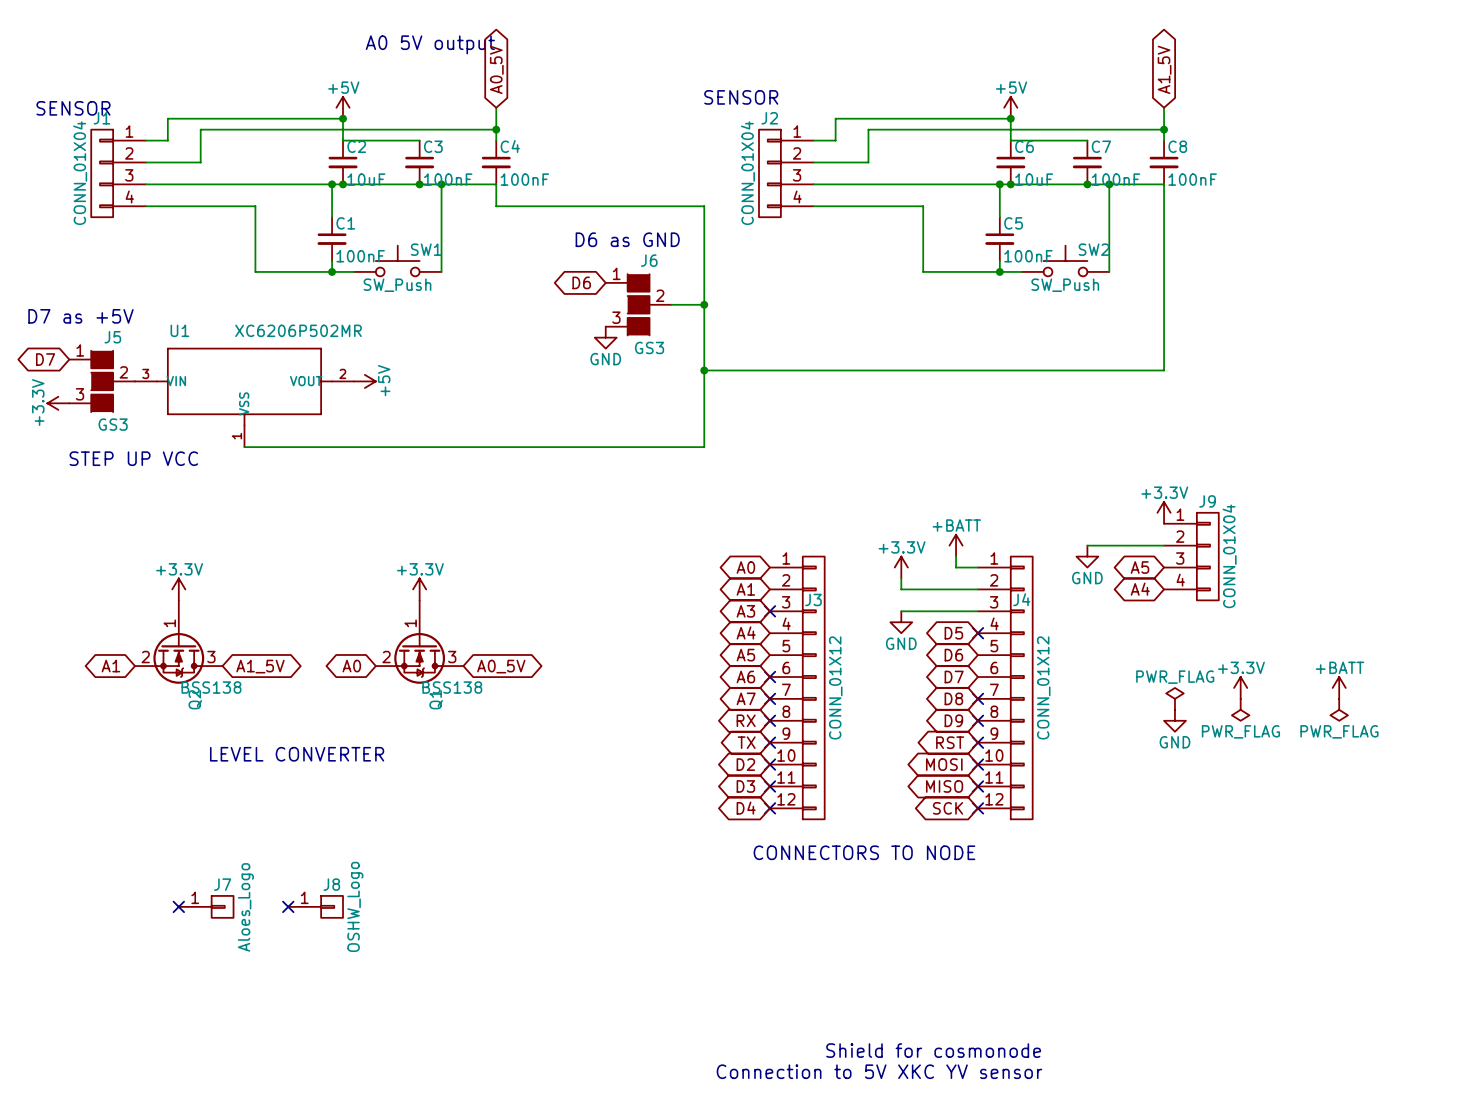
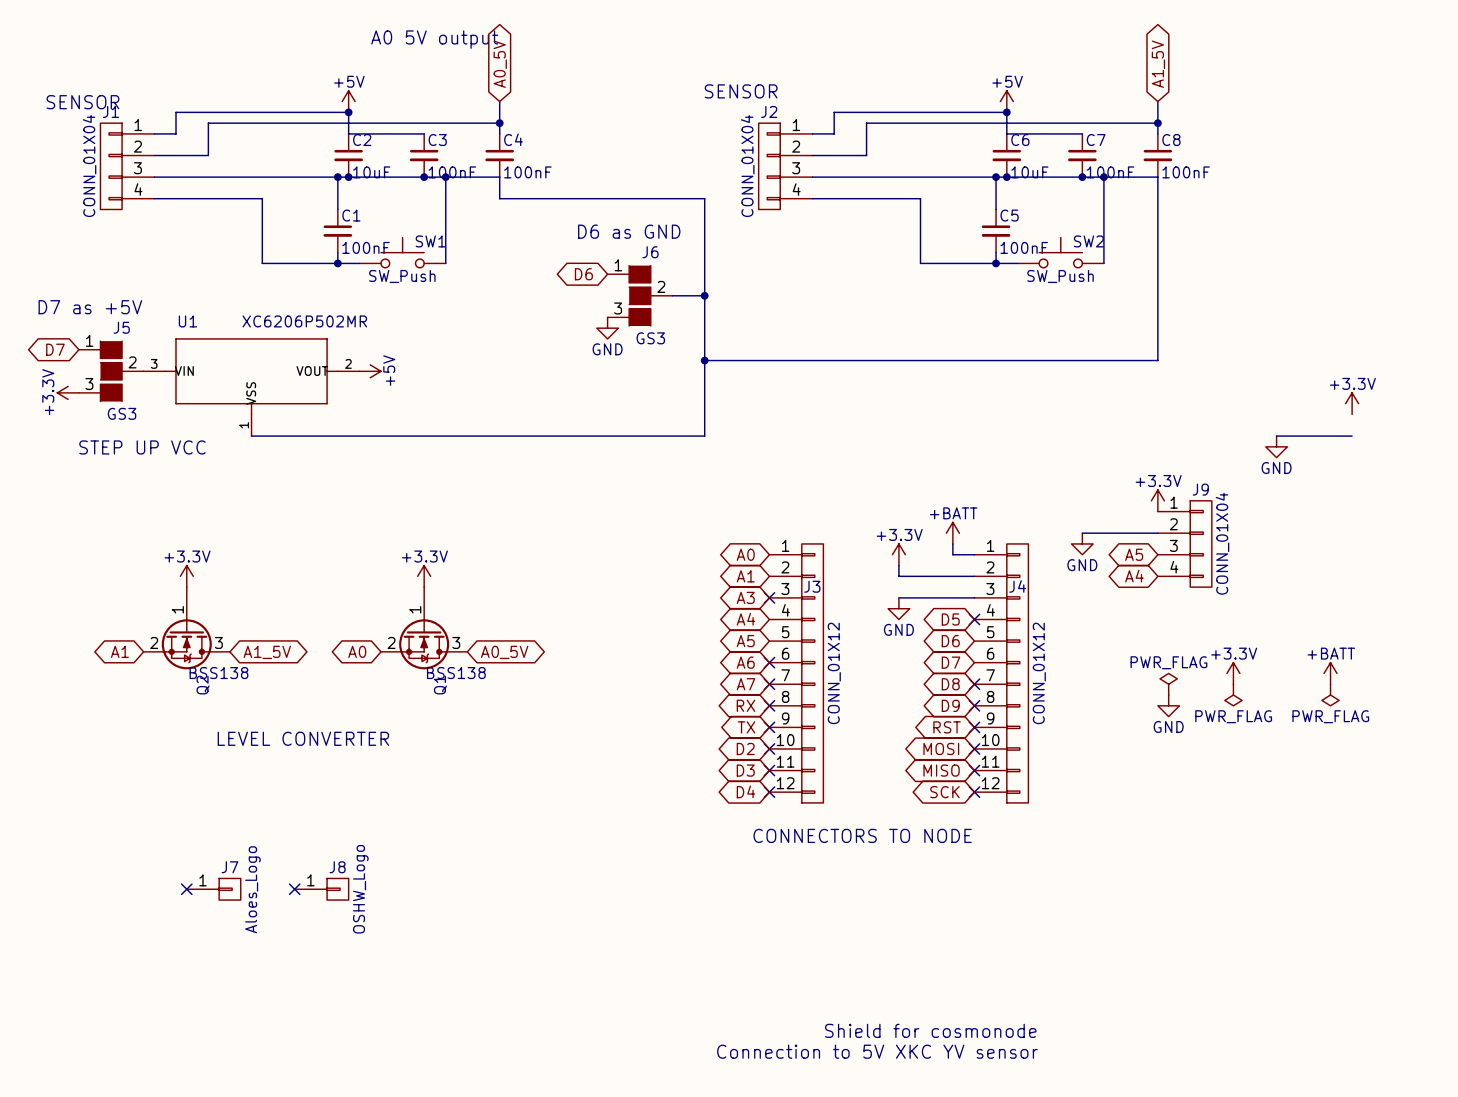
power symbol: none -> +3.3V (1352, 403)
wire: none -> (1276, 436) (1352, 436)
power symbol: none -> GND (1276, 446)

